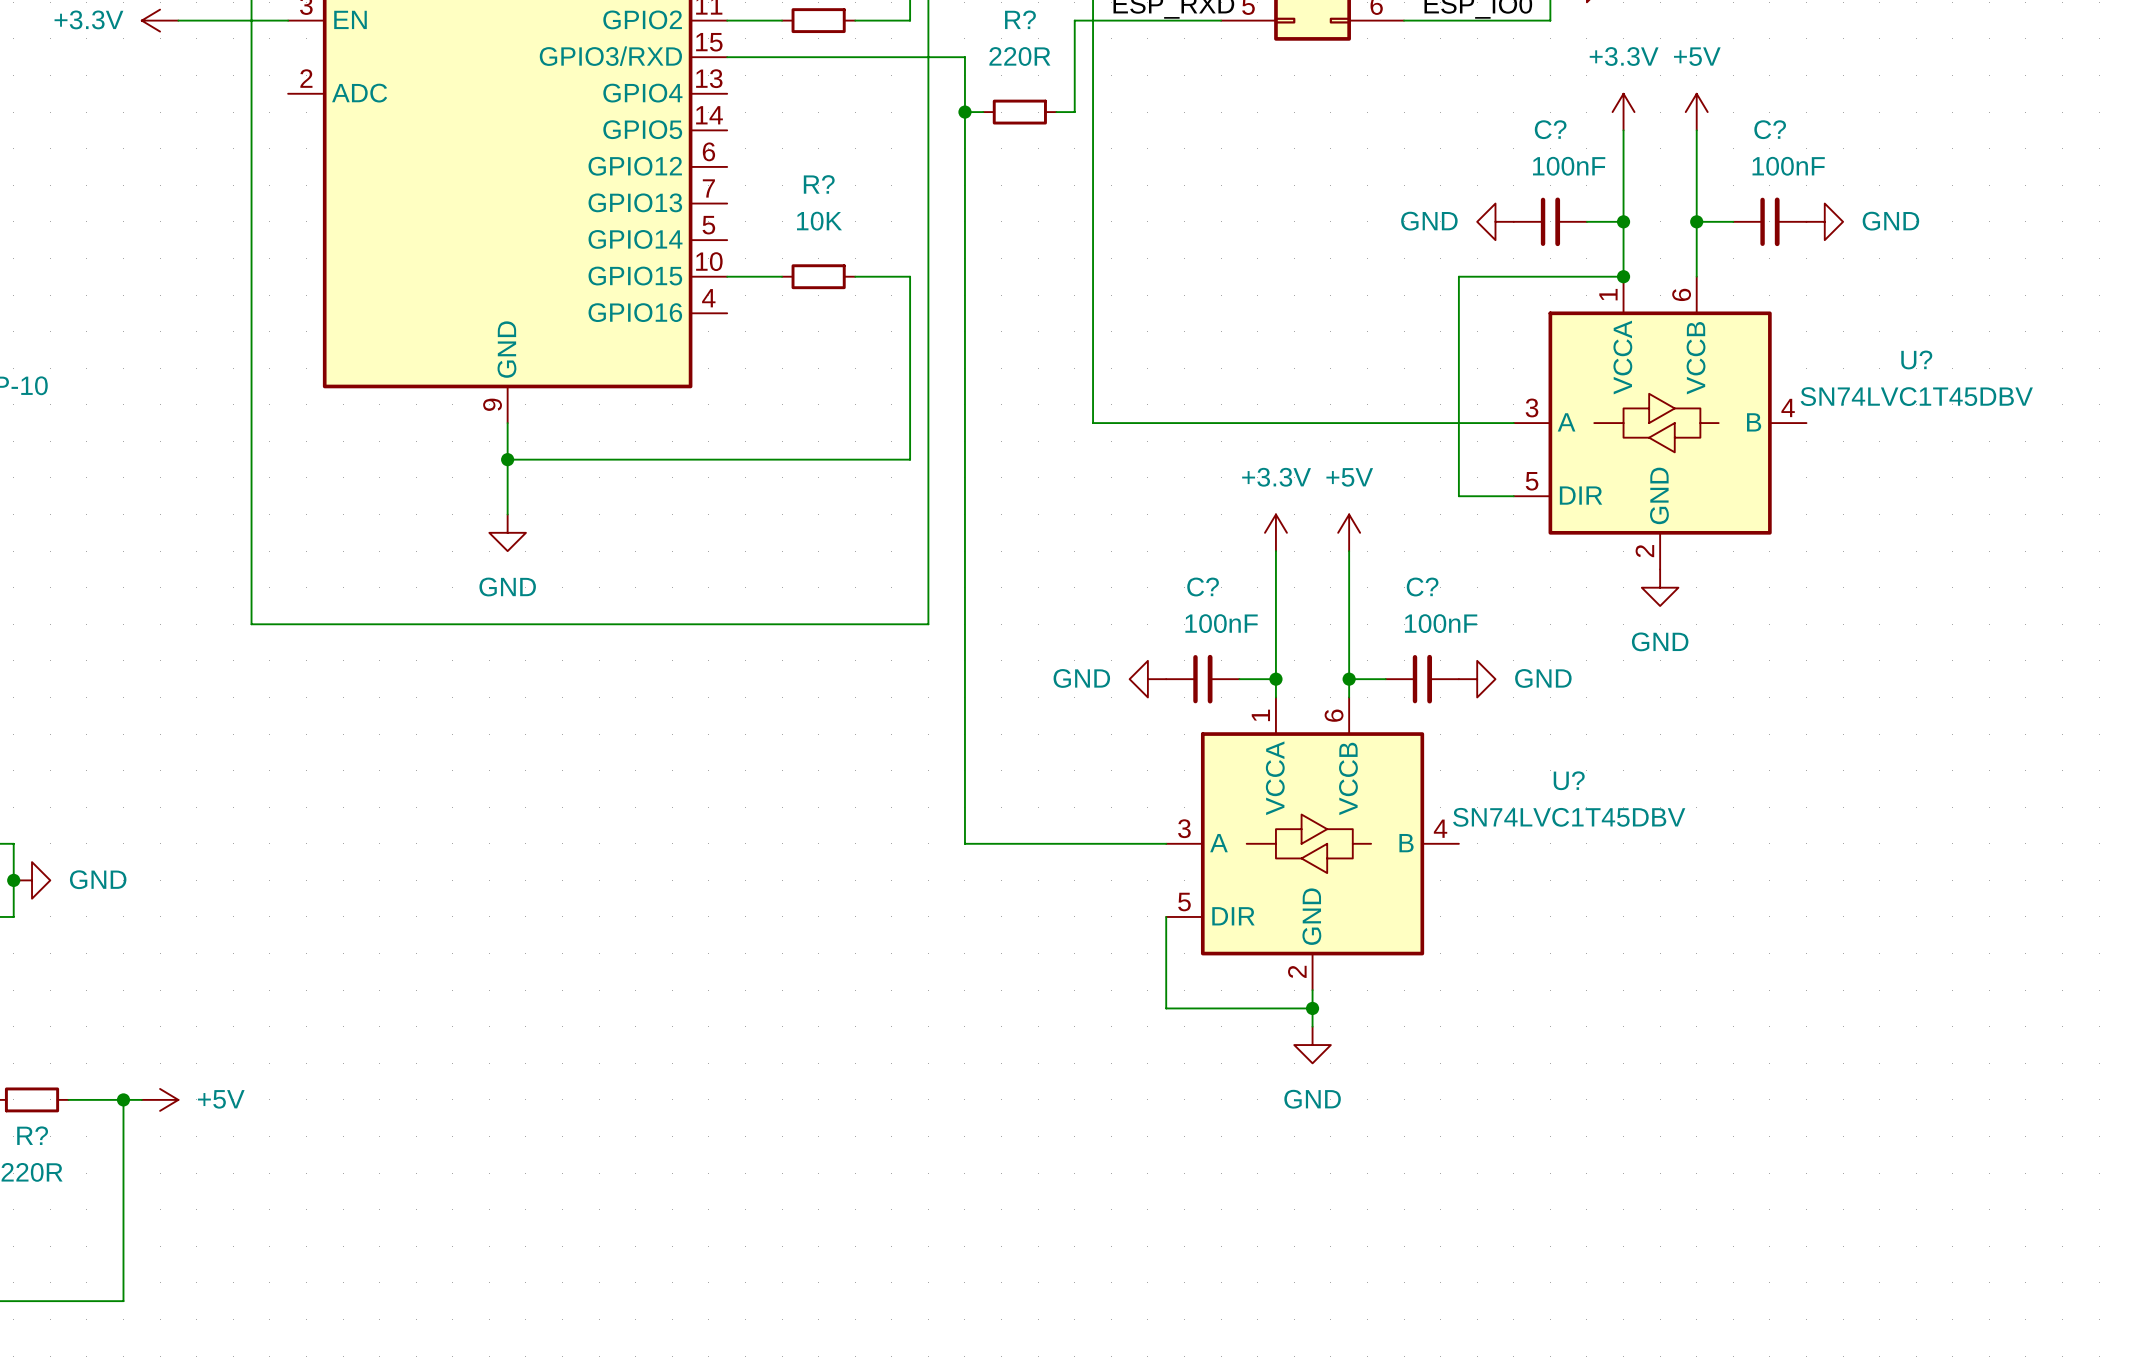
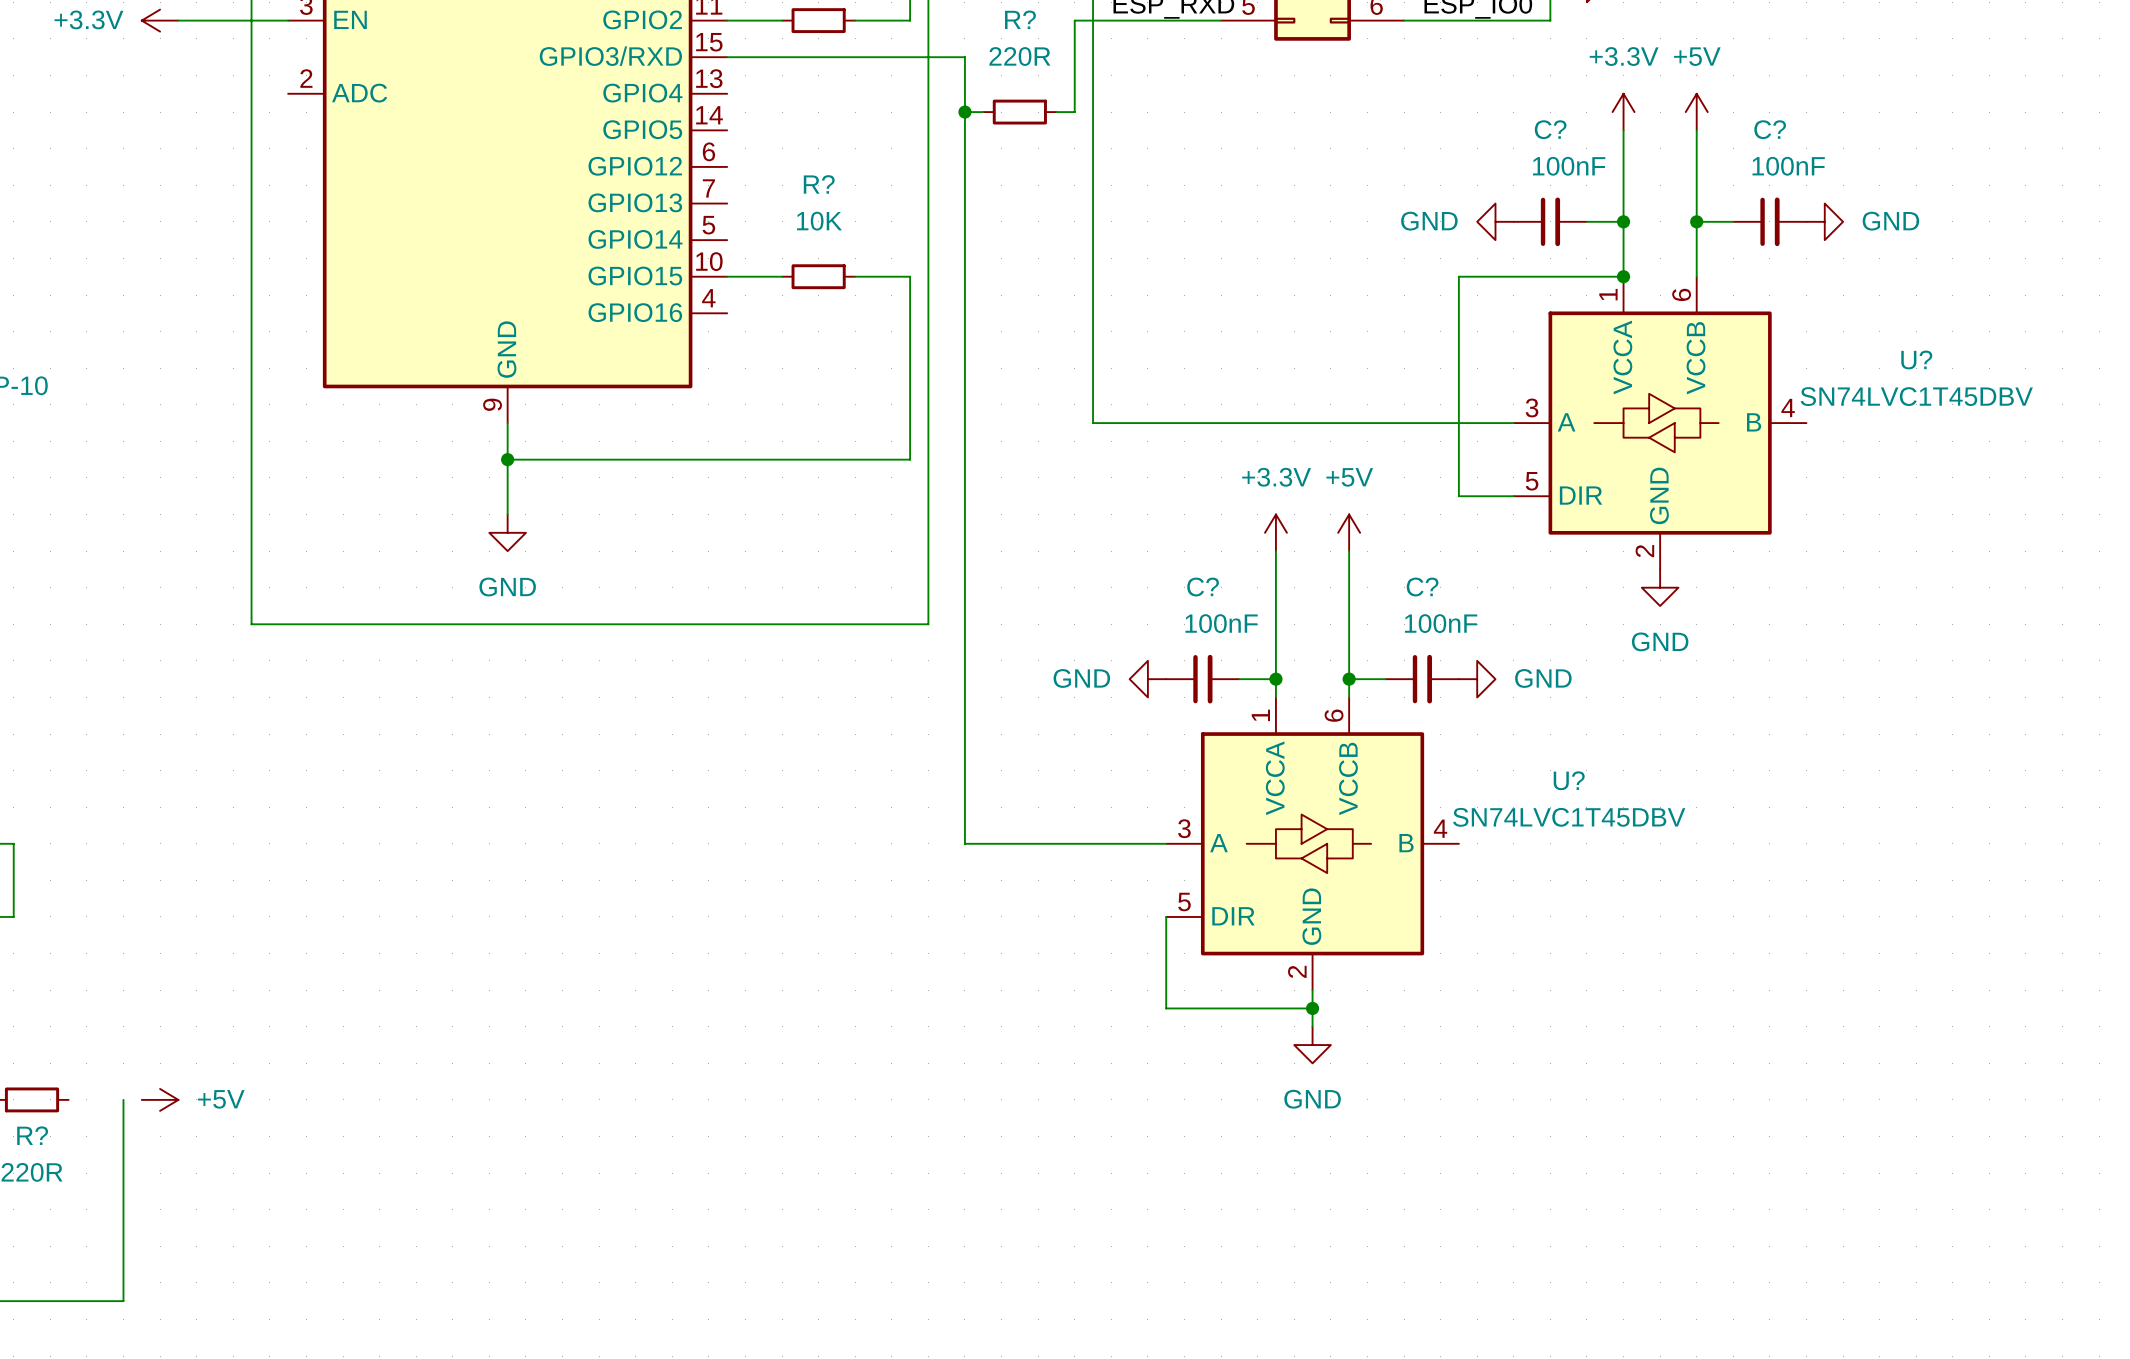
junction: (13, 880) -> none
power symbol: GND (32, 880) -> none
wire: (68, 1099) (141, 1099) -> none
junction: (123, 1099) -> none

